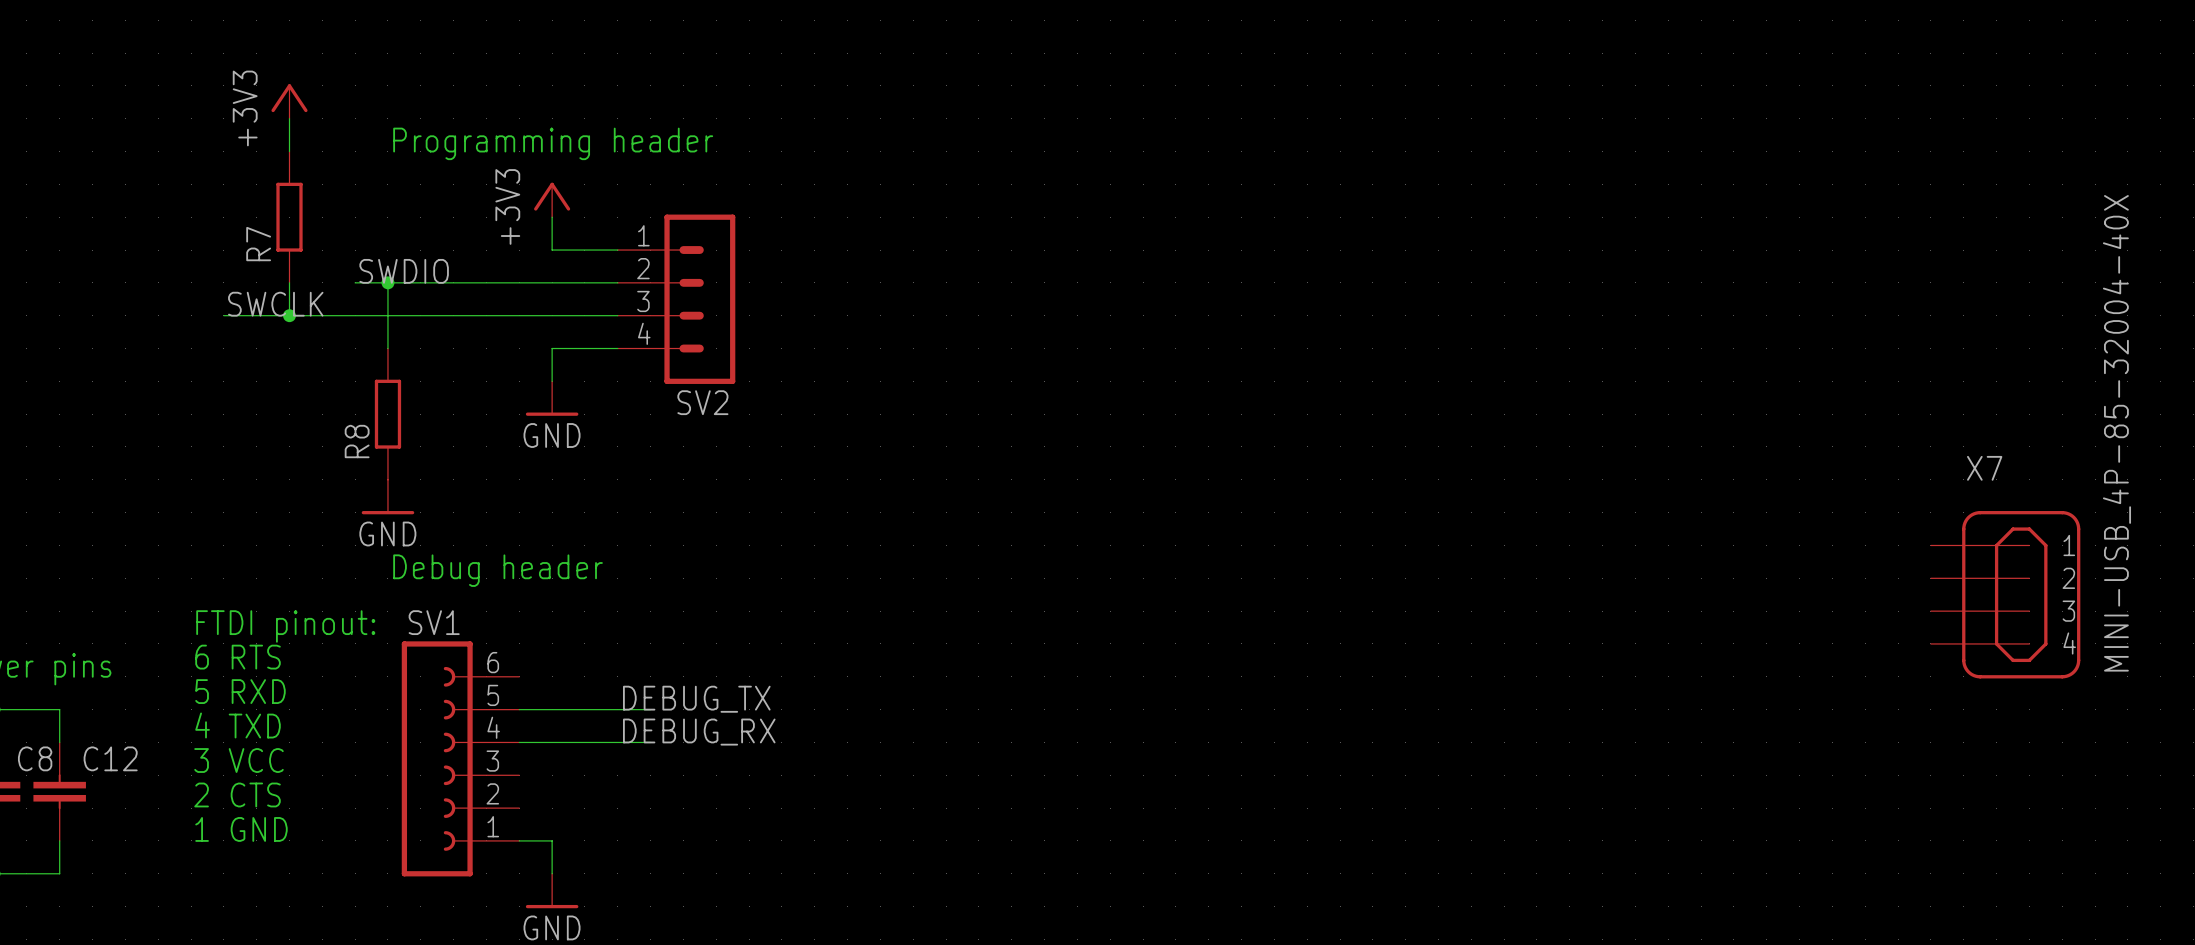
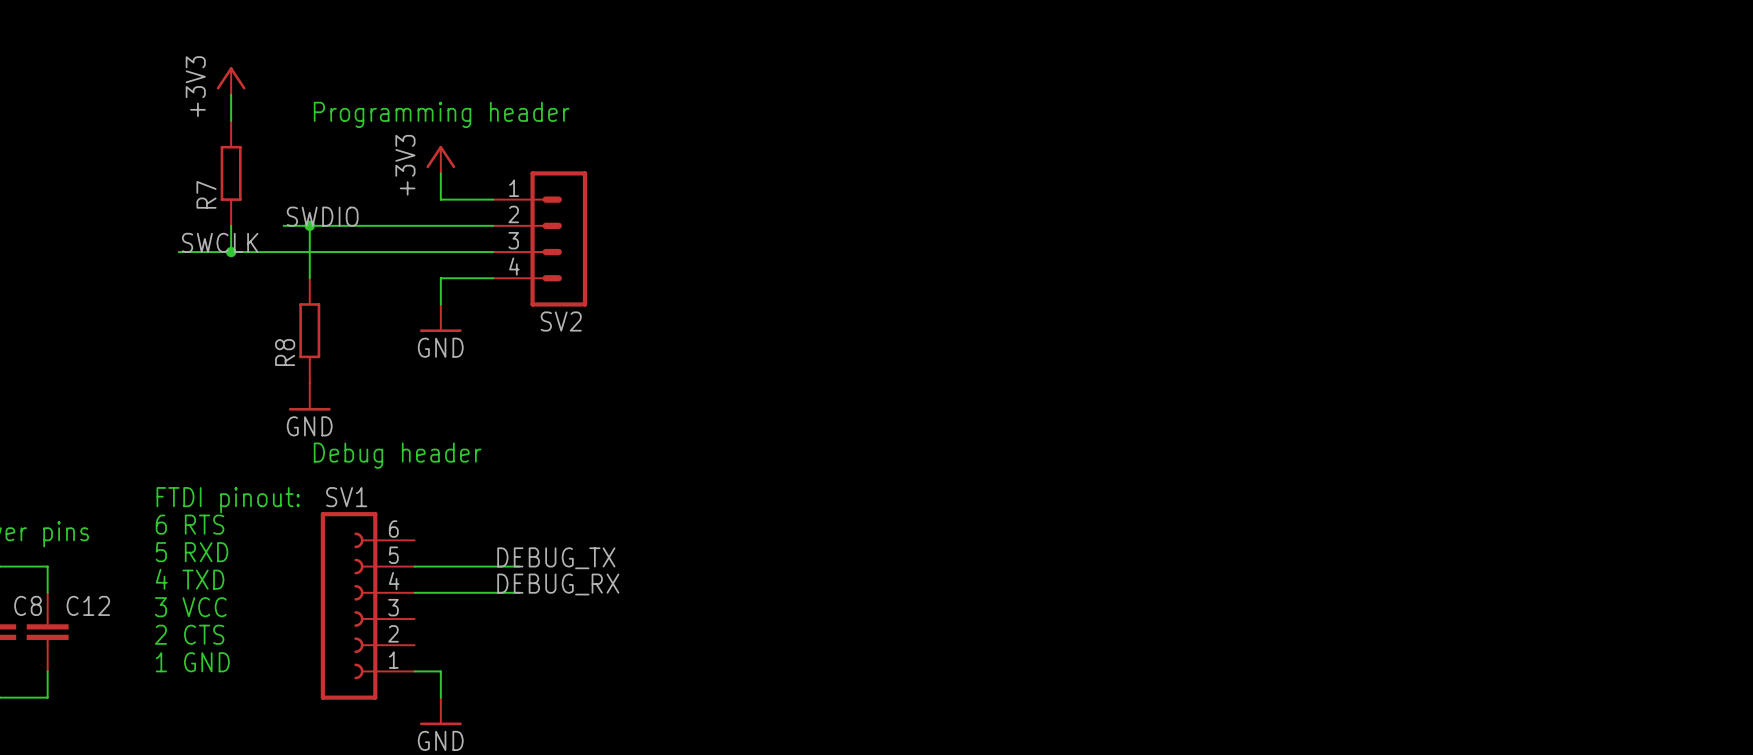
X7: MINI-USB_4P-85-32004-40X (2005, 594) -> none

